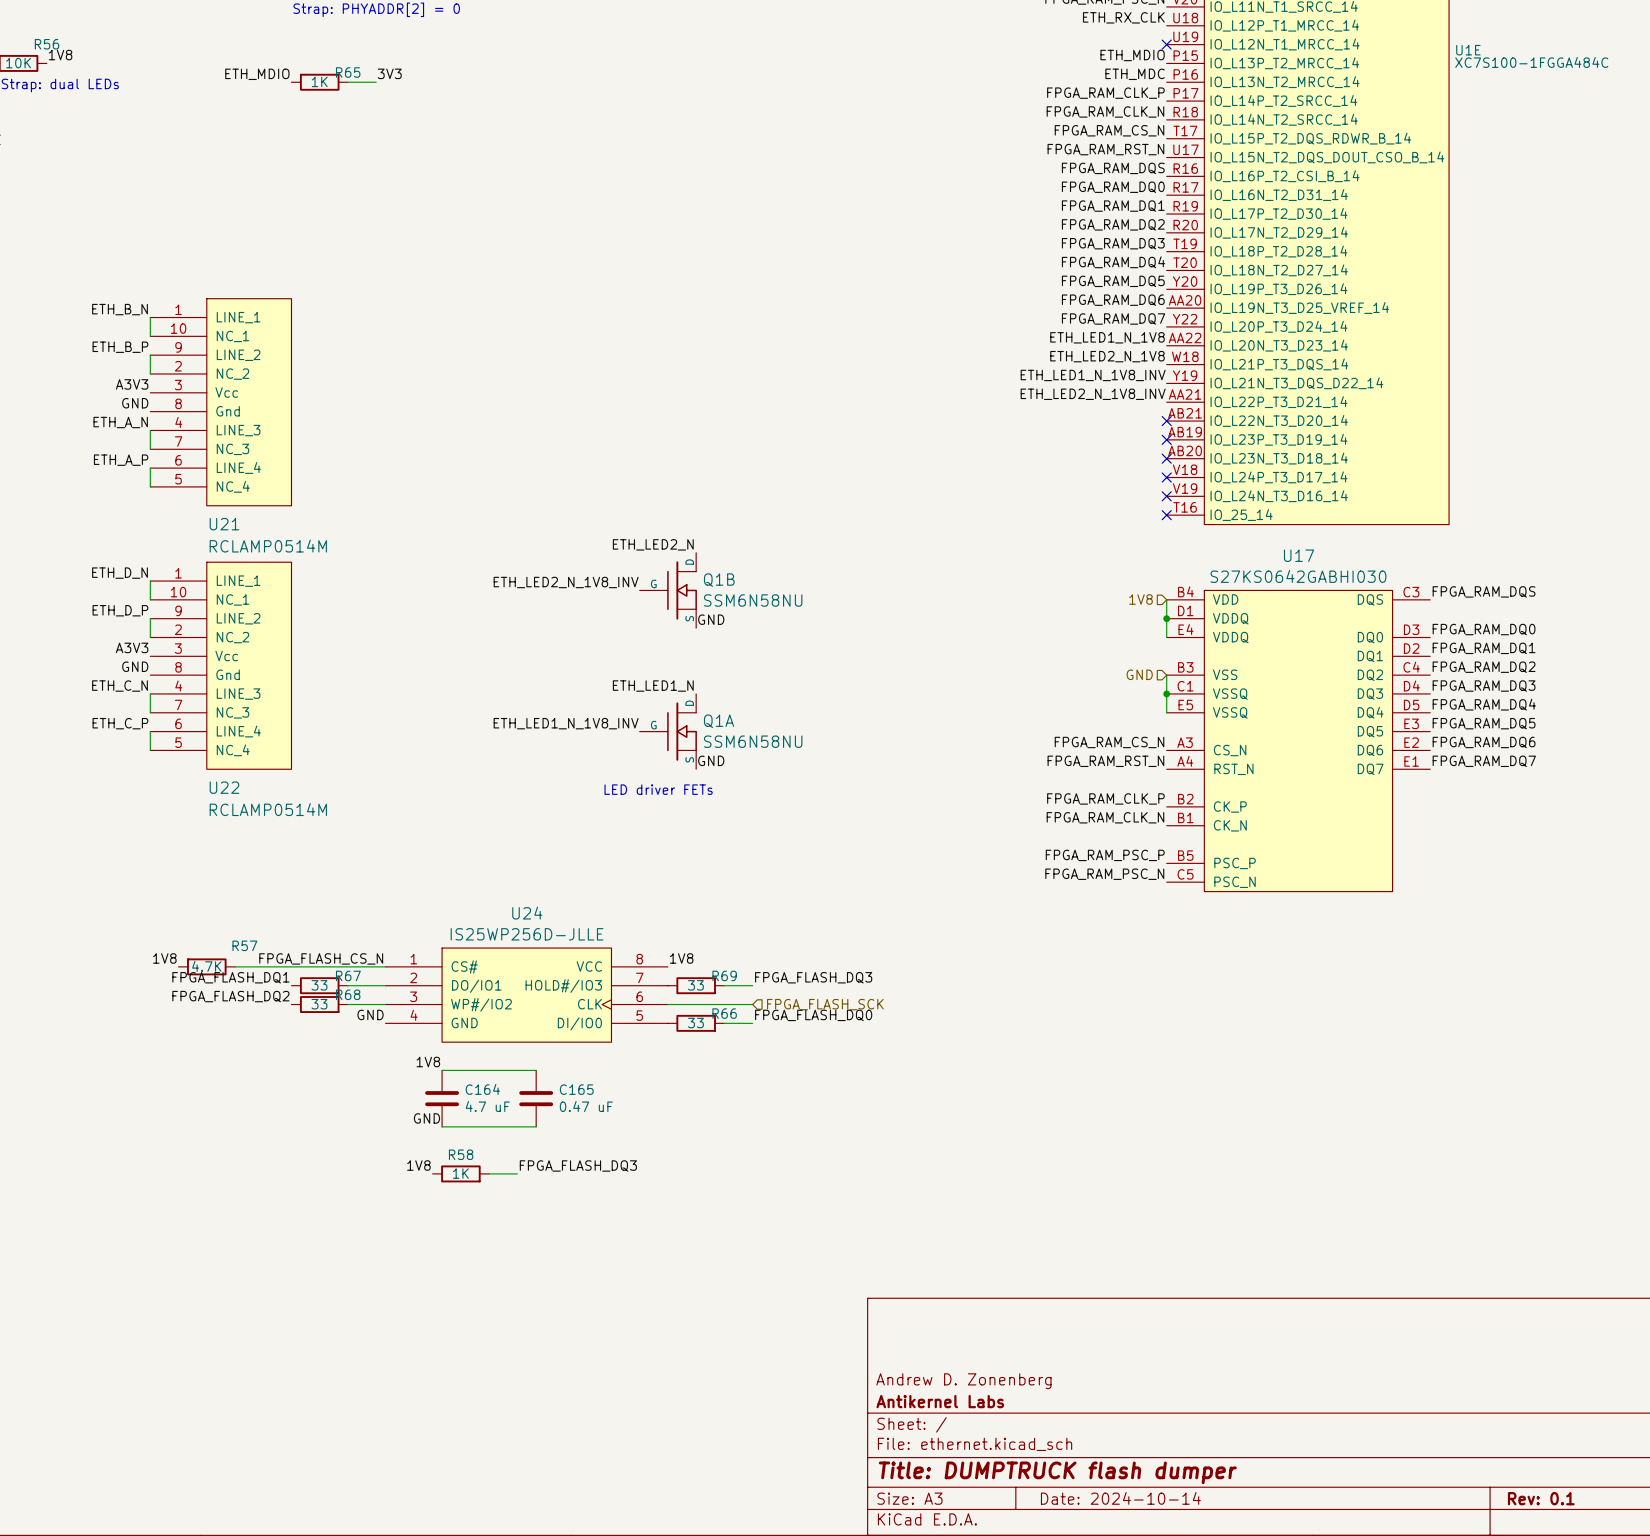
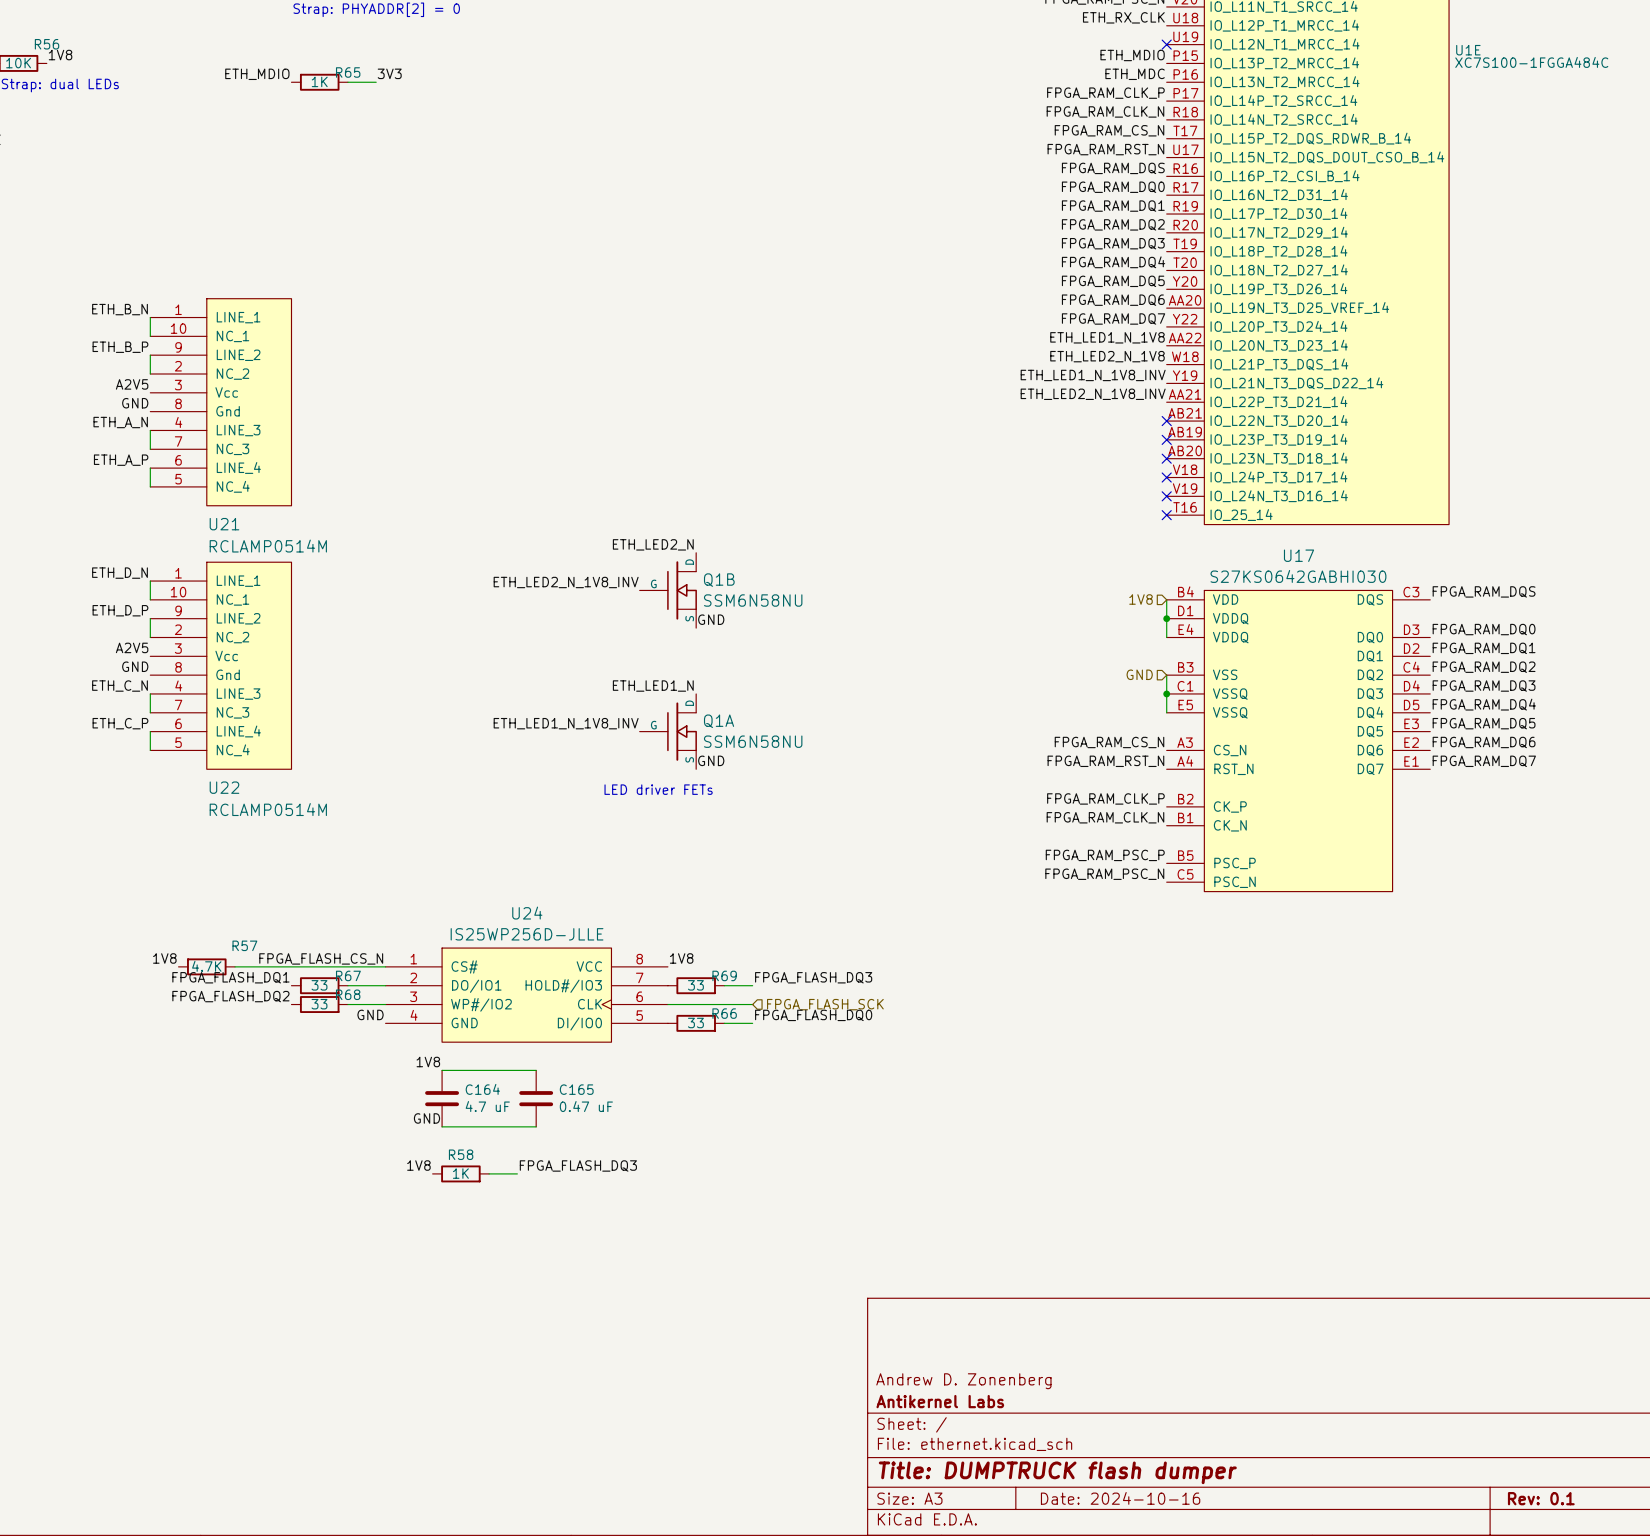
label: A3V3 (132, 384) -> A2V5 (132, 384)
label: A3V3 (132, 647) -> A2V5 (132, 647)
title block: Date: 2024-10-14 (1120, 1498) -> Date: 2024-10-16 (1120, 1498)

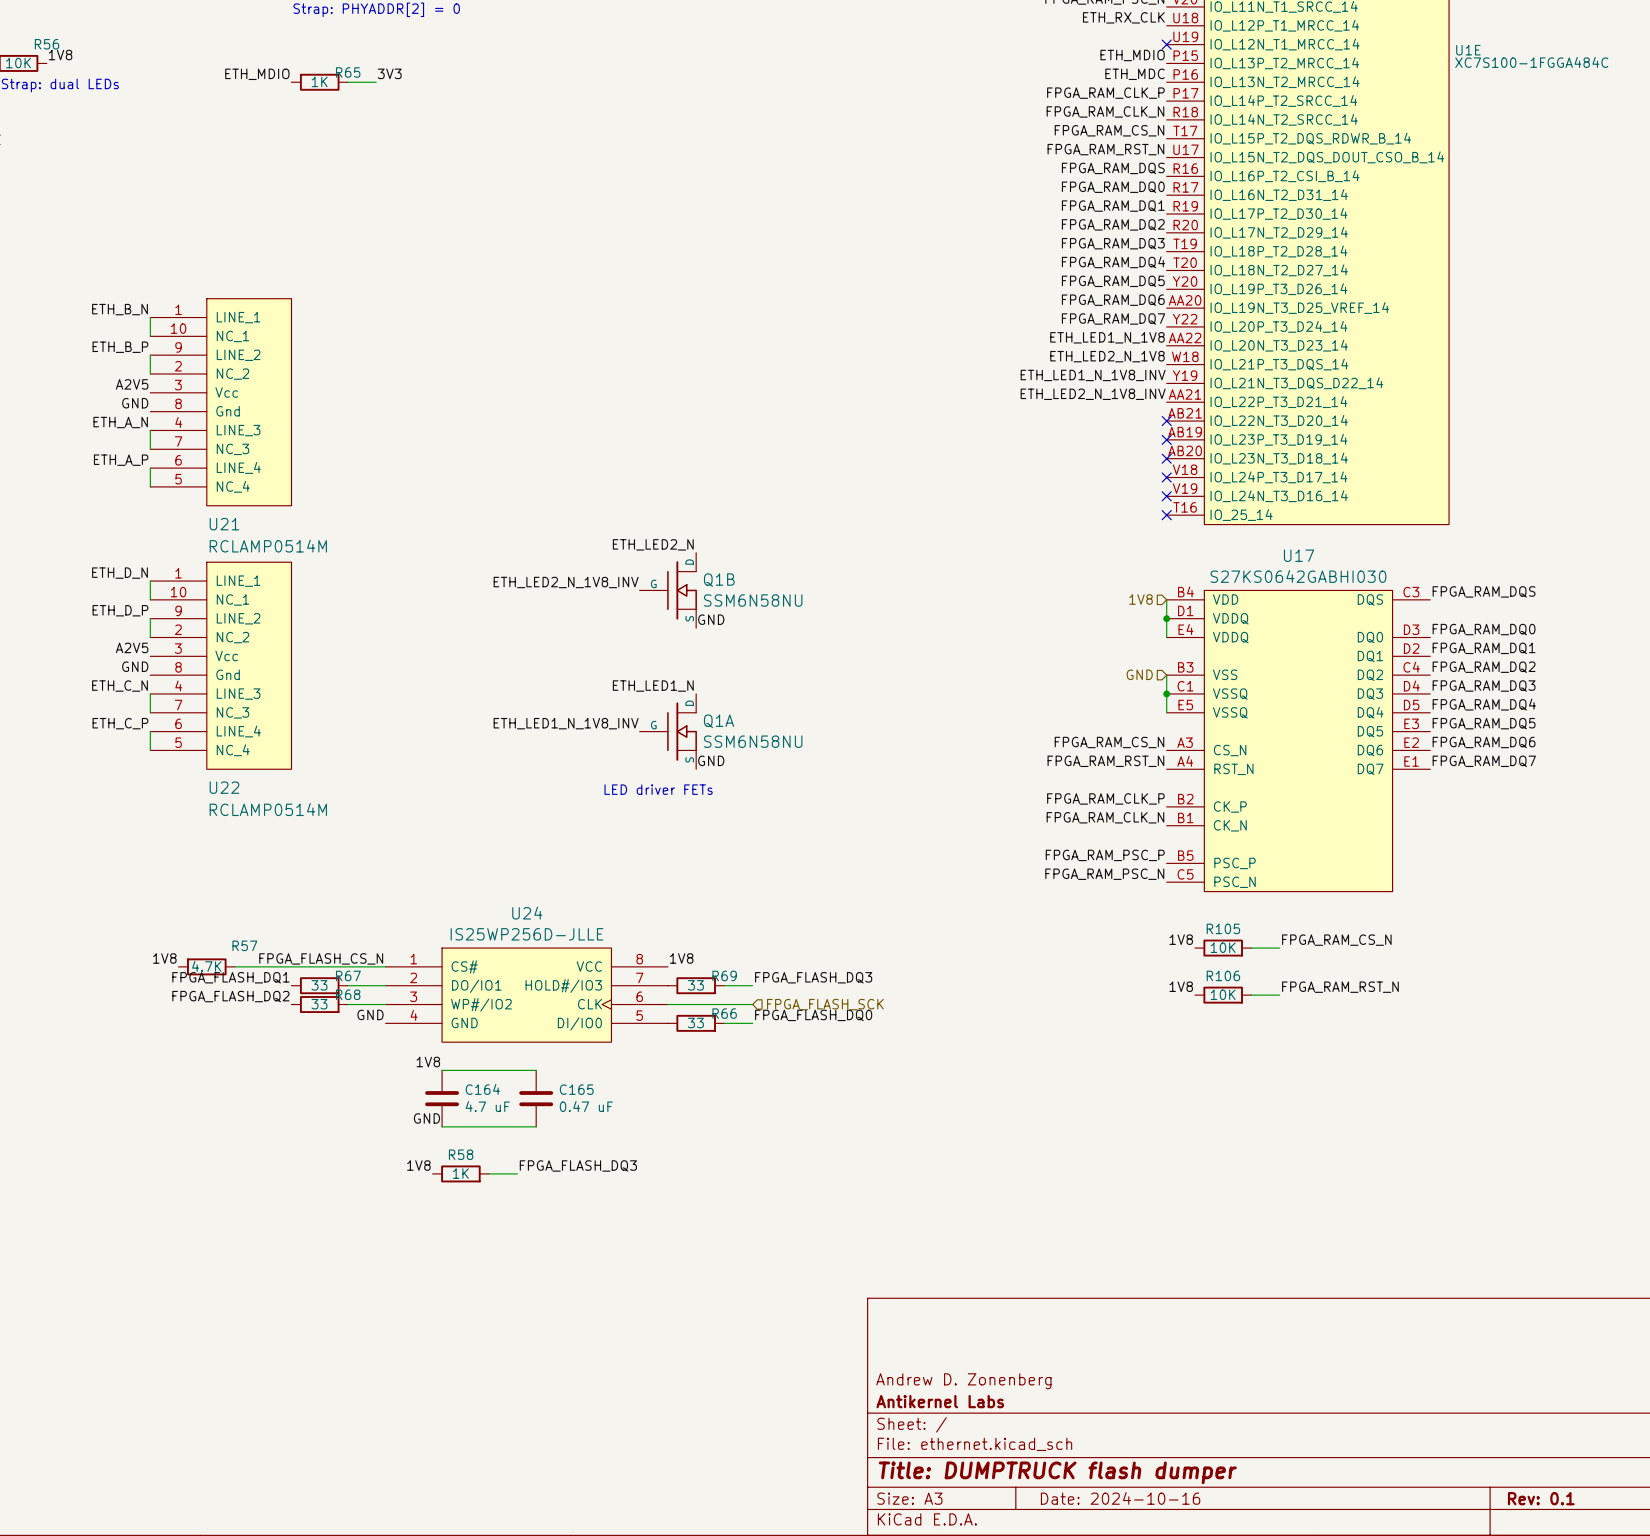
label: none -> 1V8 (1181, 939)
label: none -> FPGA_RAM_CS_N (1336, 940)
R105: none -> 10K (1223, 948)
wire: none -> (1251, 948) (1279, 948)
label: none -> 1V8 (1181, 986)
label: none -> FPGA_RAM_RST_N (1340, 987)
R106: none -> 10K (1223, 995)
wire: none -> (1251, 995) (1279, 995)

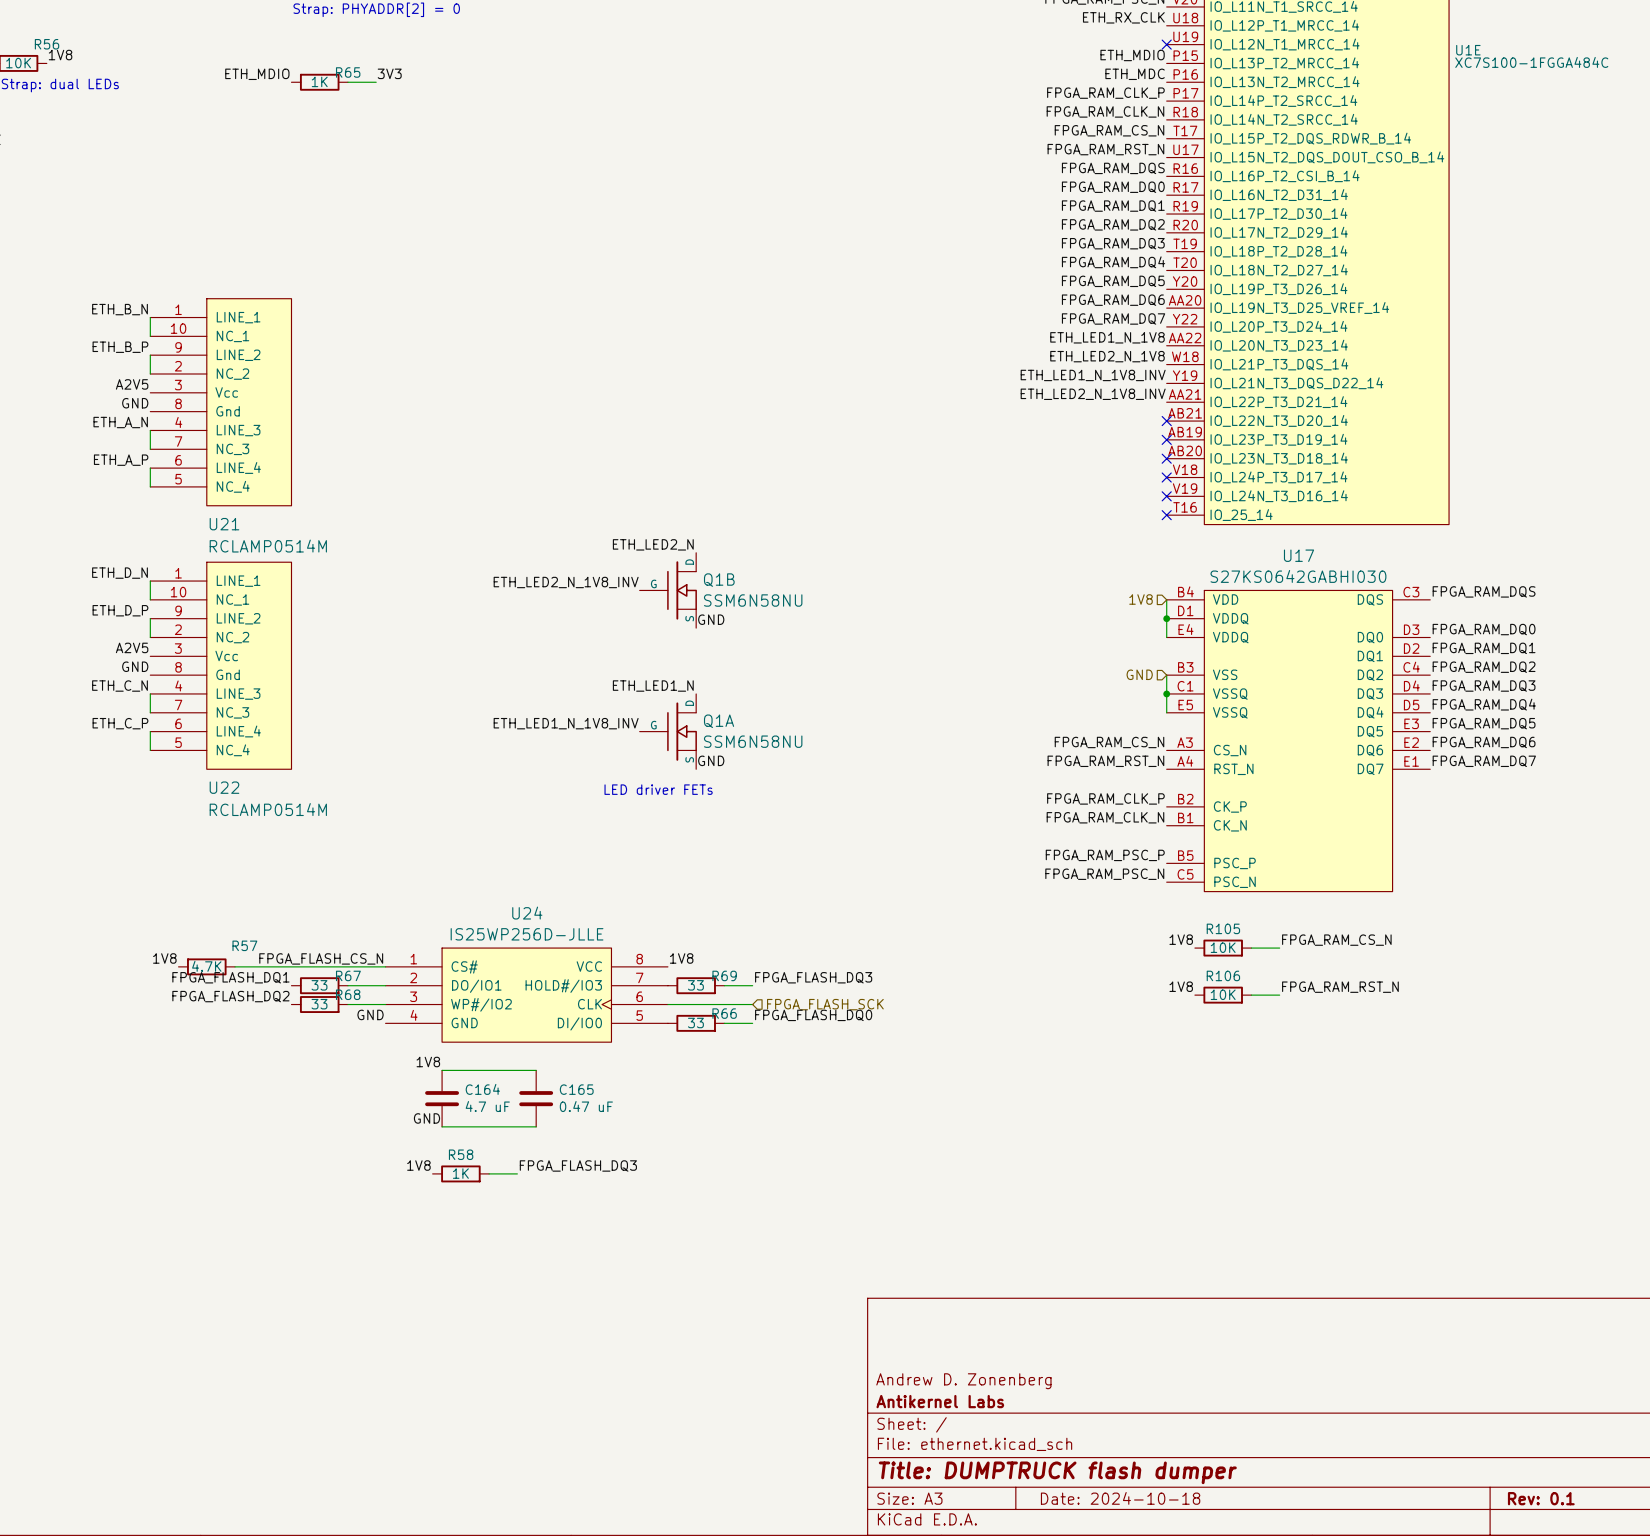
title block: Date: 2024-10-16 (1120, 1498) -> Date: 2024-10-18 (1120, 1498)

